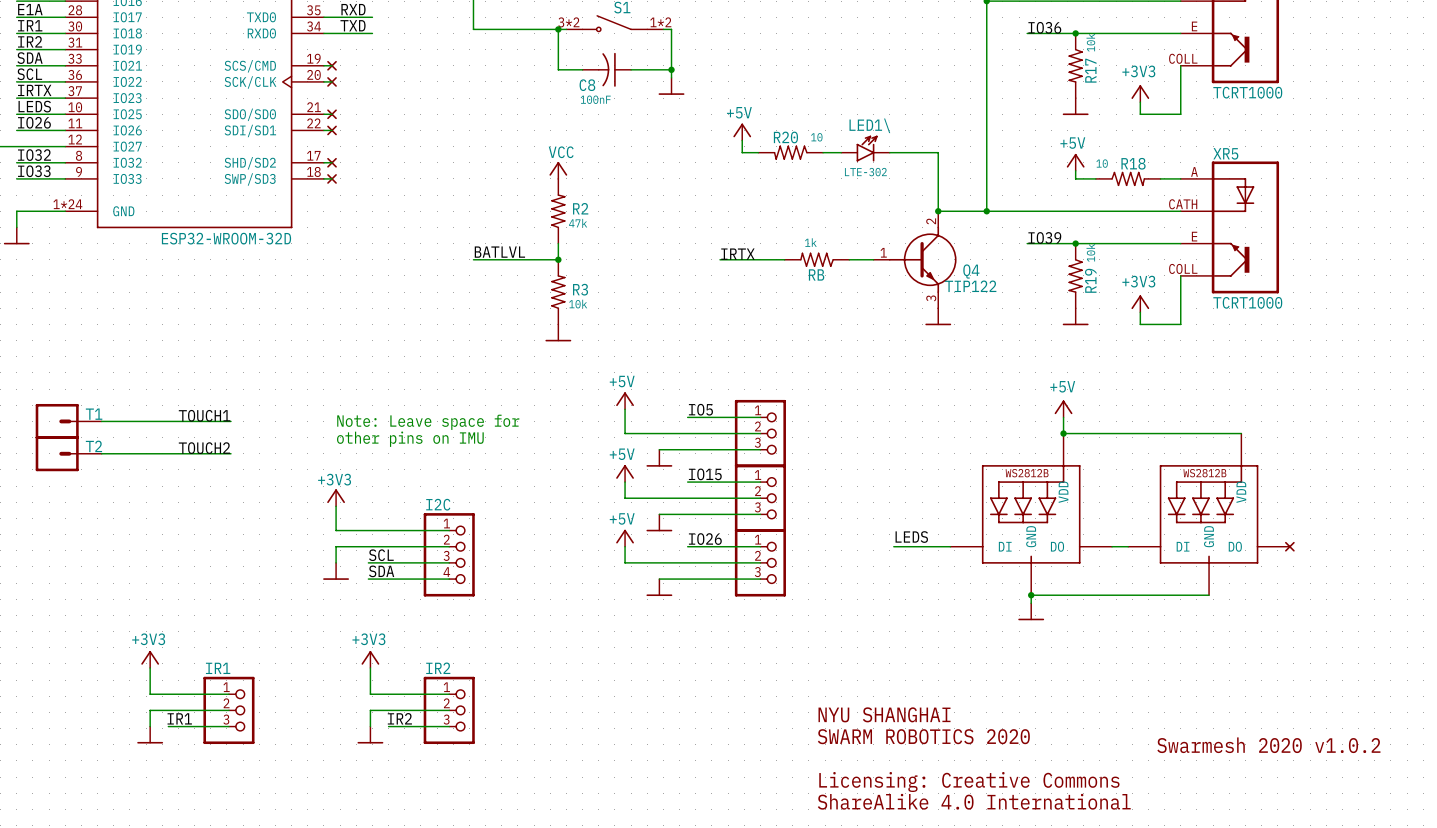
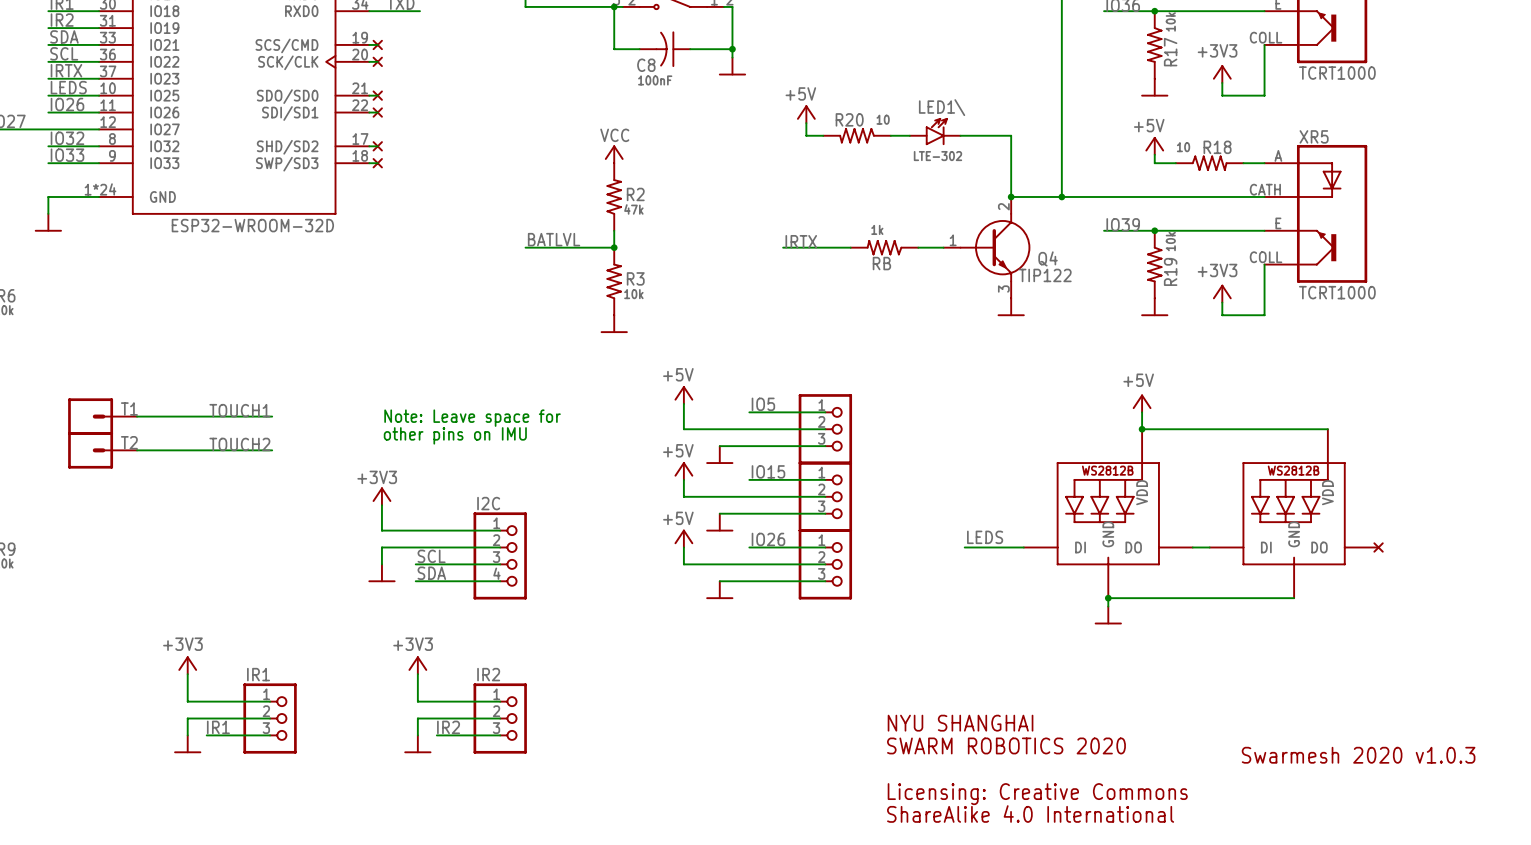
text: Swarmesh 2020 v1.0.2 (1268, 745) -> Swarmesh 2020 v1.0.3 (1358, 755)

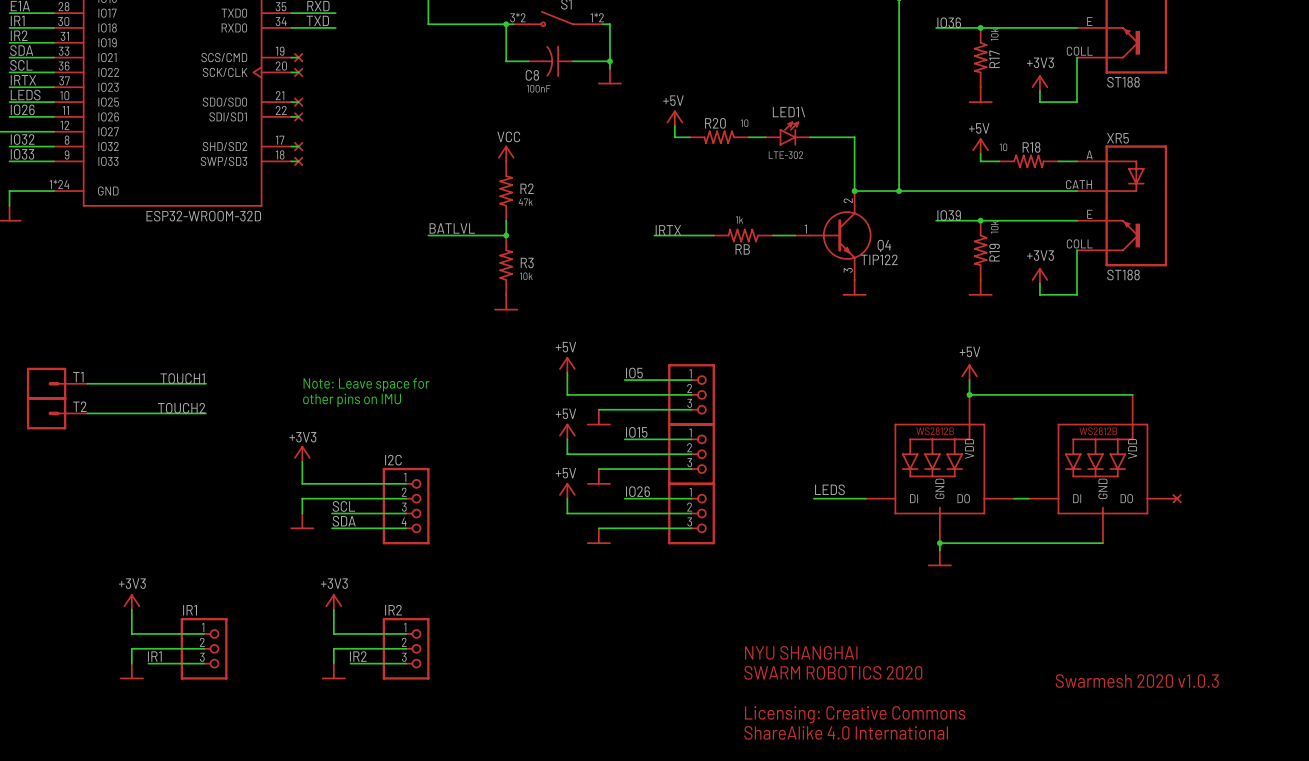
part value: TCRT1000 (1337, 73) -> ST188 (1123, 82)
XR5 value: TCRT1000 (1337, 292) -> ST188 (1123, 274)

